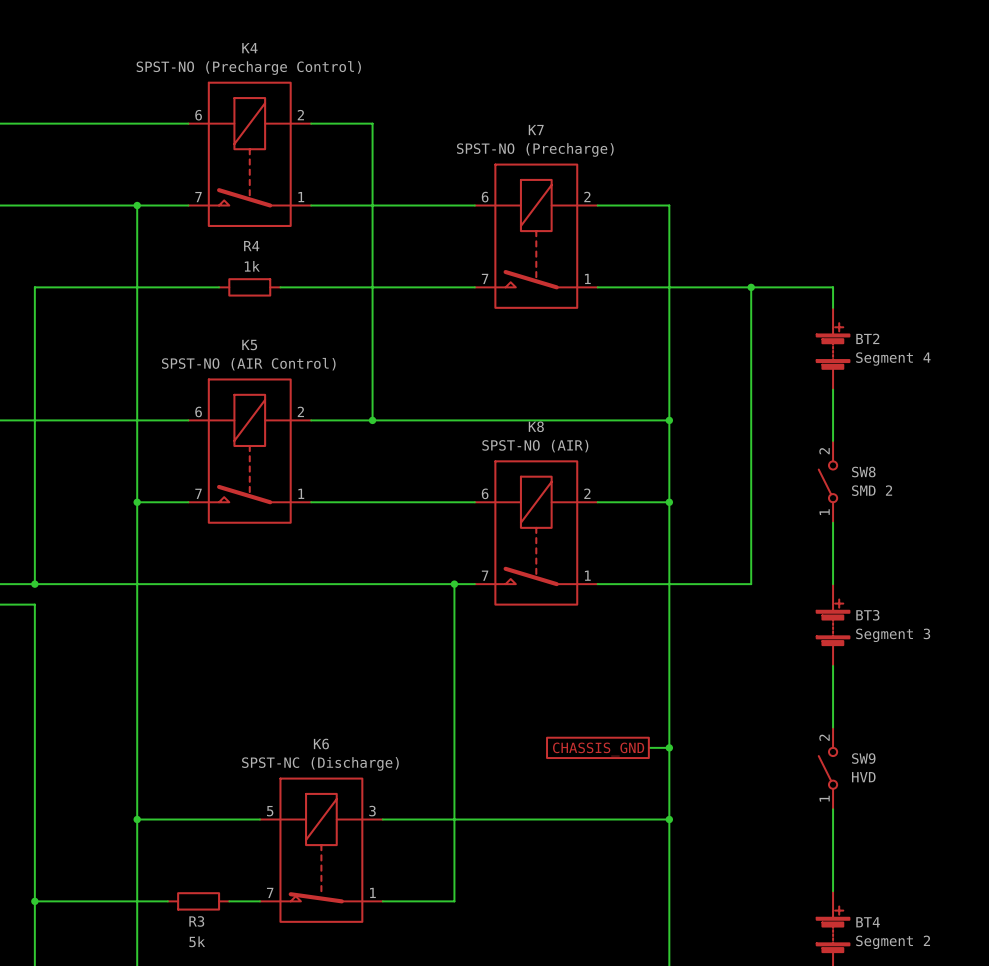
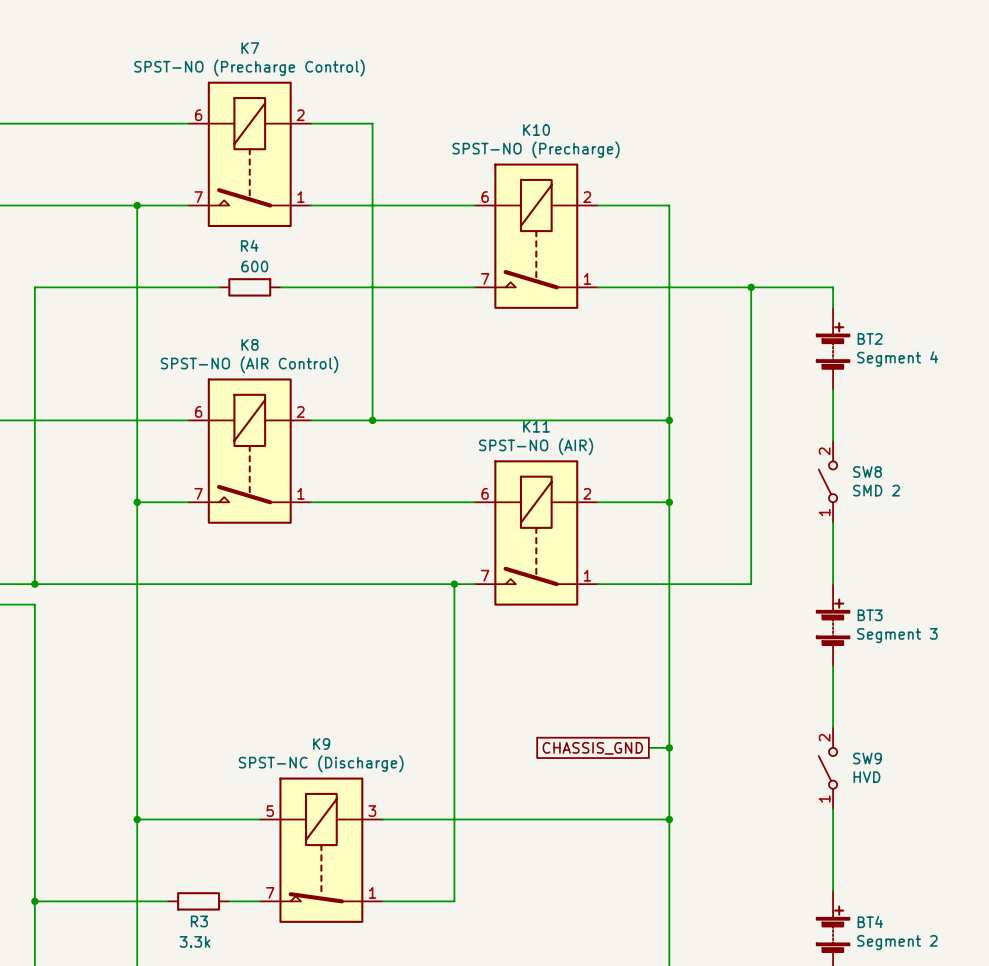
K4 name: K4 (249, 48) -> K7 (250, 48)
K7 name: K7 (536, 130) -> K10 (536, 130)
R4 value: 1k (252, 266) -> 600 (254, 266)
K5 name: K5 (249, 345) -> K8 (250, 344)
K8 name: K8 (536, 426) -> K11 (536, 426)
K6 name: K6 (321, 744) -> K9 (321, 744)
R3 value: 5k (197, 941) -> 3.3k (195, 941)

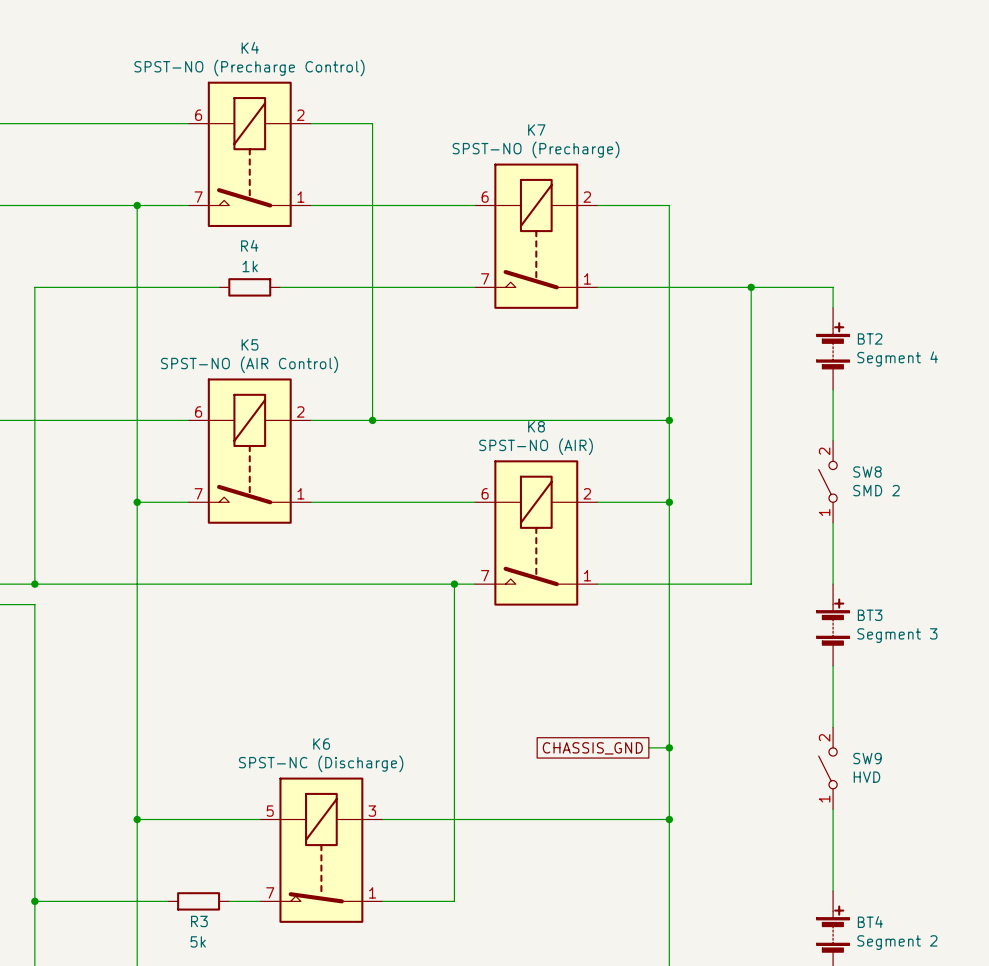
K7 name: K7 (250, 48) -> K4 (250, 47)
K10 name: K10 (536, 130) -> K7 (536, 130)
R4 value: 600 (254, 266) -> 1k (250, 266)
K8 name: K8 (250, 344) -> K5 (250, 344)
K11 name: K11 (536, 426) -> K8 (536, 426)
K9 name: K9 (321, 744) -> K6 (321, 744)
R3 value: 3.3k (195, 941) -> 5k (198, 941)

